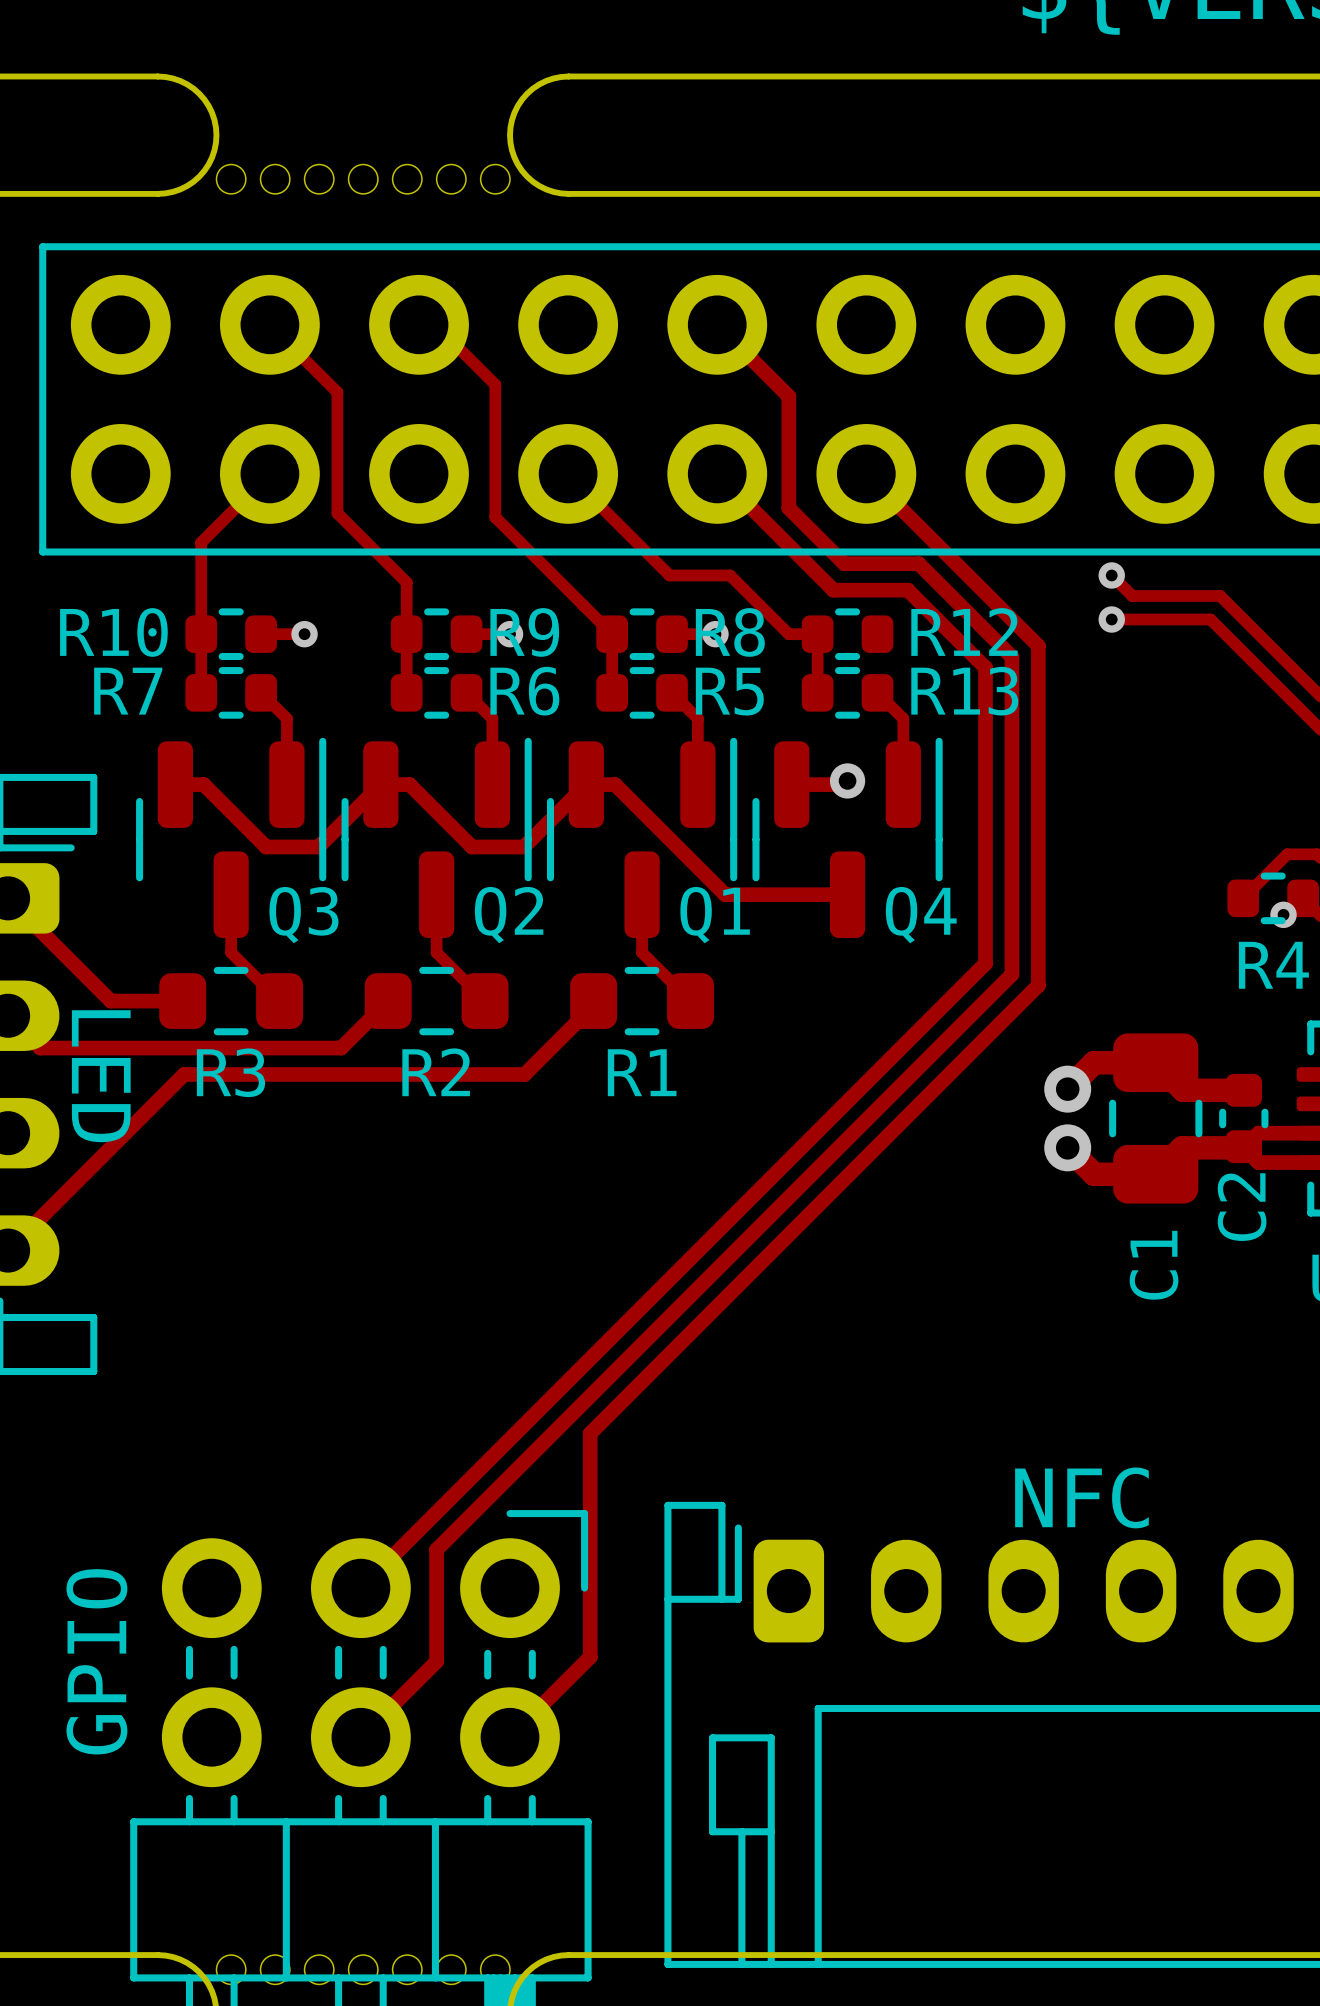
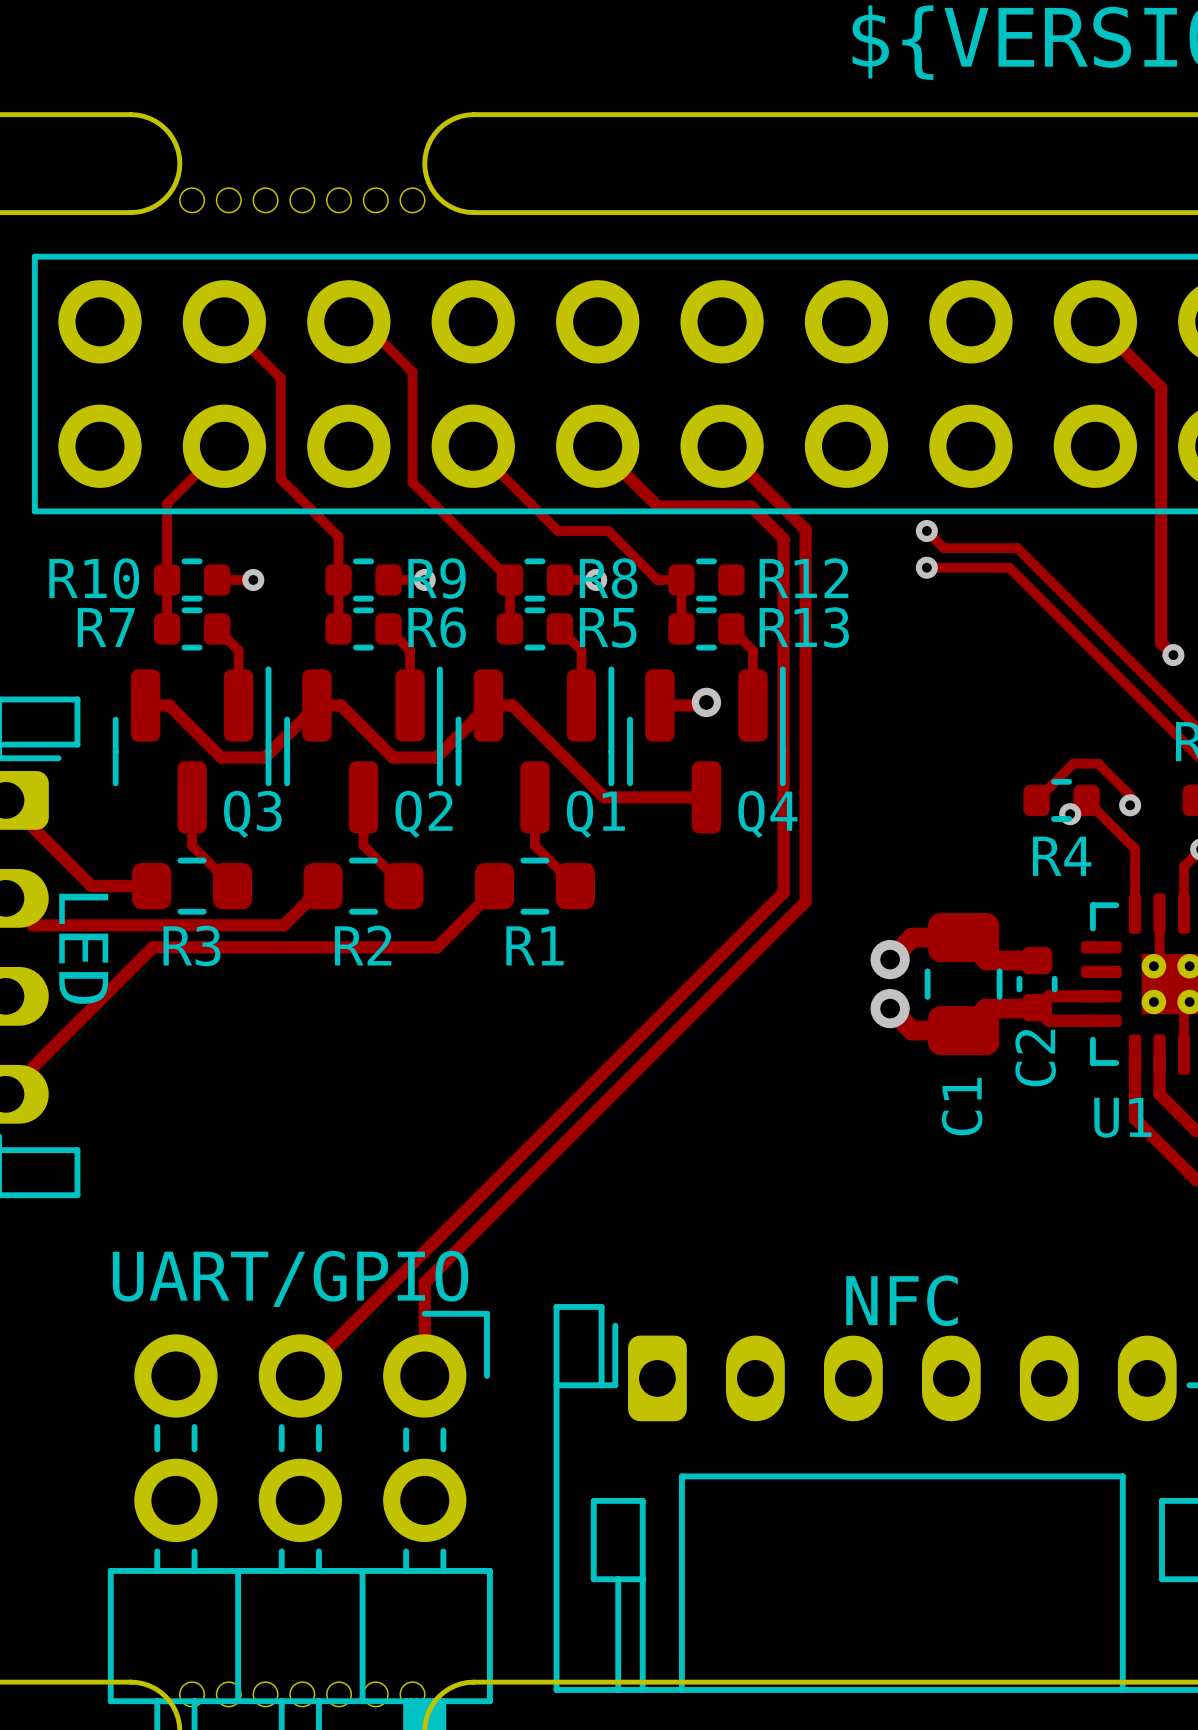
track: (717, 324) (788, 396) (788, 508) (844, 563) (918, 563) -> (657, 506) (751, 506) (765, 521)
track: (789, 546) (833, 590) (907, 590) (985, 667) (985, 963) (940, 1009) -> (783, 538) (783, 892)
track: (966, 574) (1038, 645) (1038, 985) (590, 1433) (590, 1657) (510, 1737) -> none
track: (940, 584) (1011, 656) (1011, 974) (966, 1019) -> (805, 529) (805, 901)
track: (510, 1476) (436, 1549) (436, 1661) (360, 1737) -> (424, 1282) (424, 1375)
text: GPIO (96, 1661) -> UART/GPIO (290, 1278)

